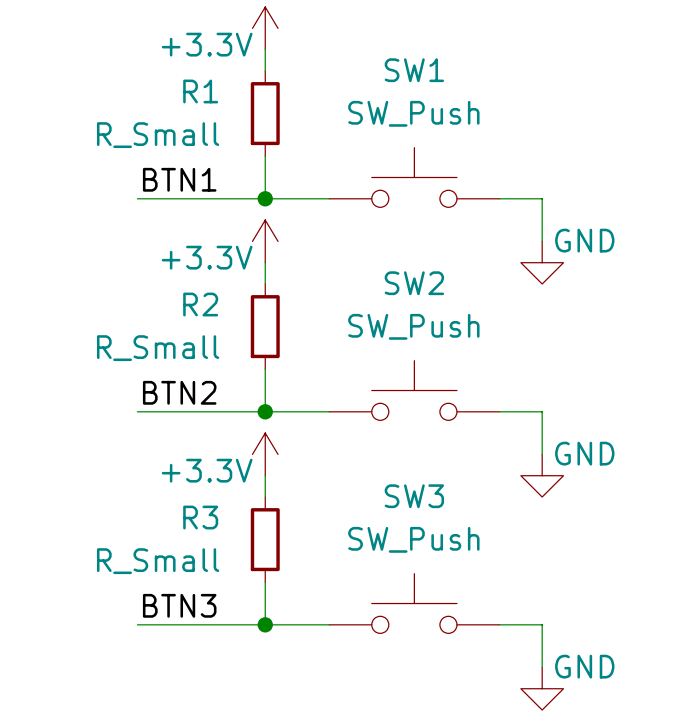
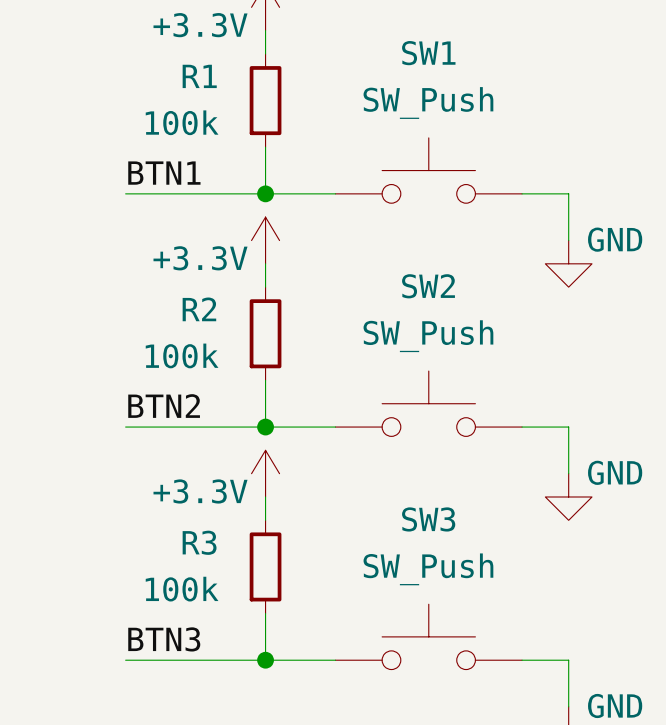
R1 value: R_Small (158, 135) -> 100k (182, 122)
R2 value: R_Small (158, 348) -> 100k (182, 355)
R3 value: R_Small (158, 561) -> 100k (182, 589)

